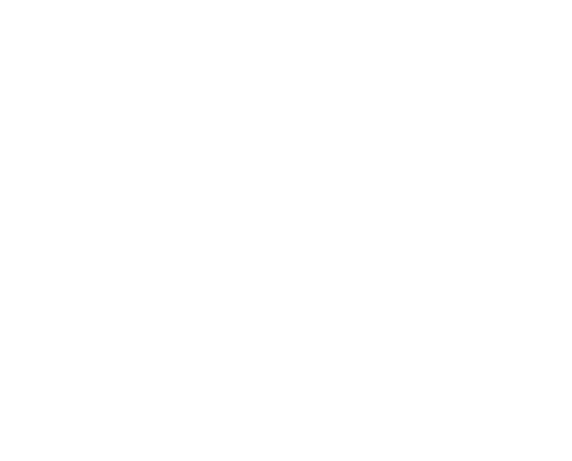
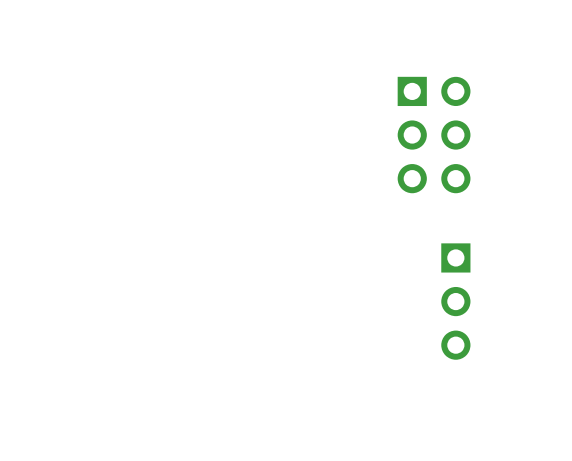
part: none -> (434, 135)
part: none -> (455, 301)

